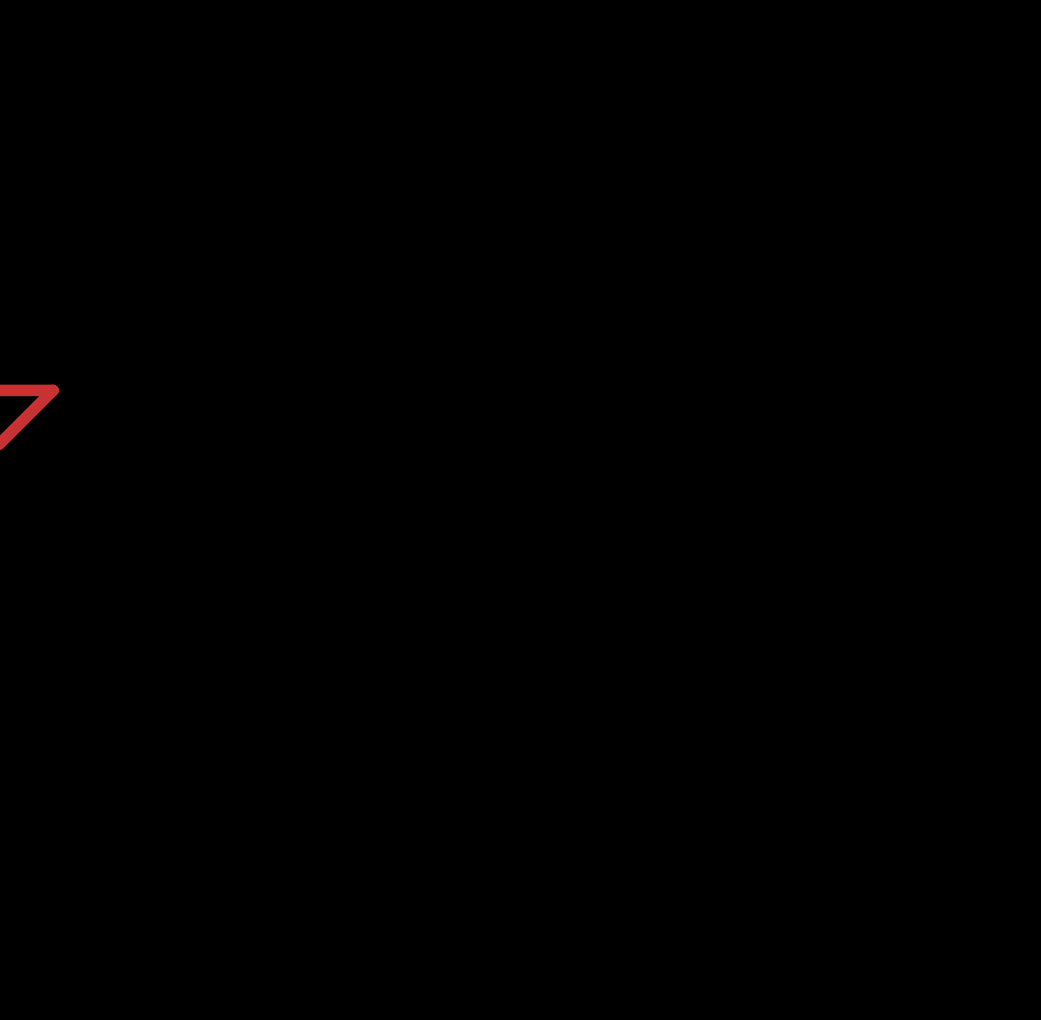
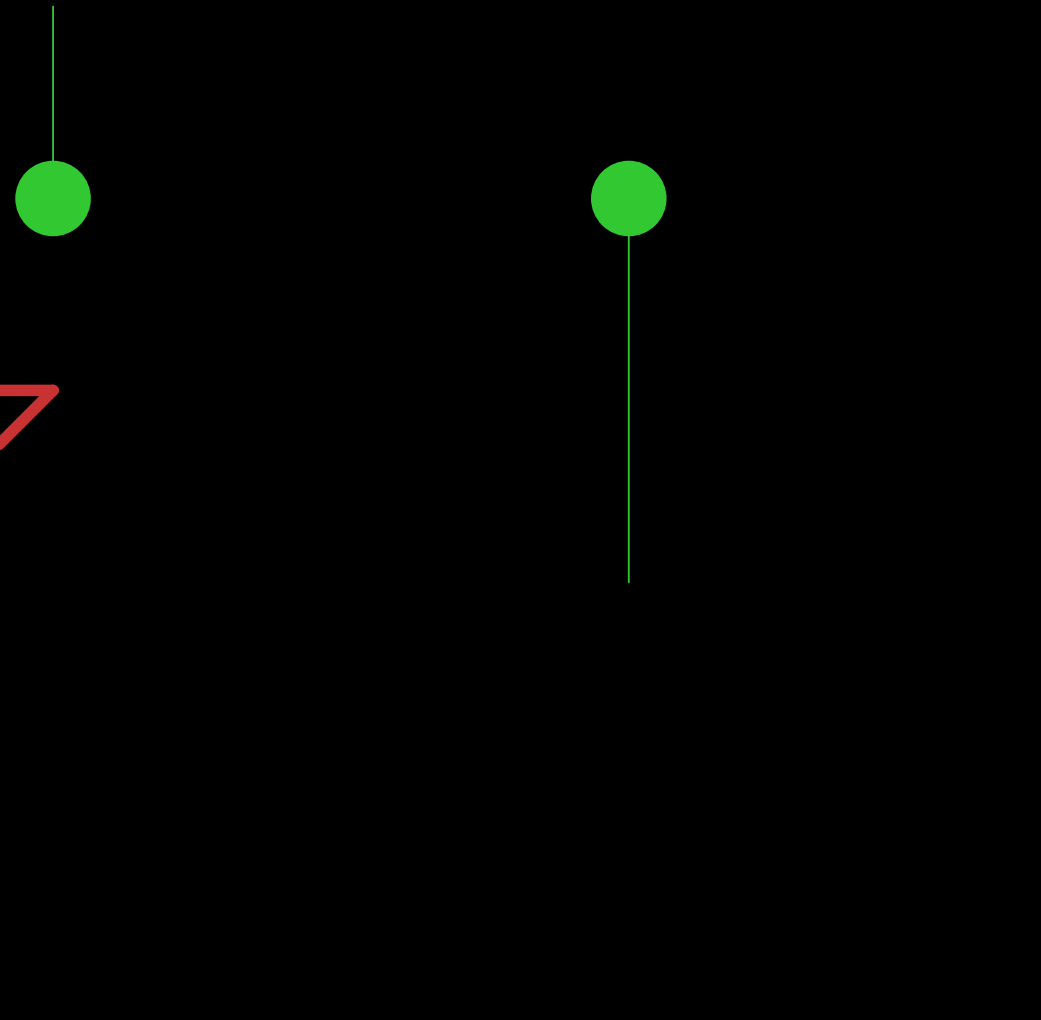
wire: none -> (53, 6) (53, 198)
junction: none -> (53, 198)
wire: none -> (628, 198) (628, 582)
junction: none -> (628, 198)

